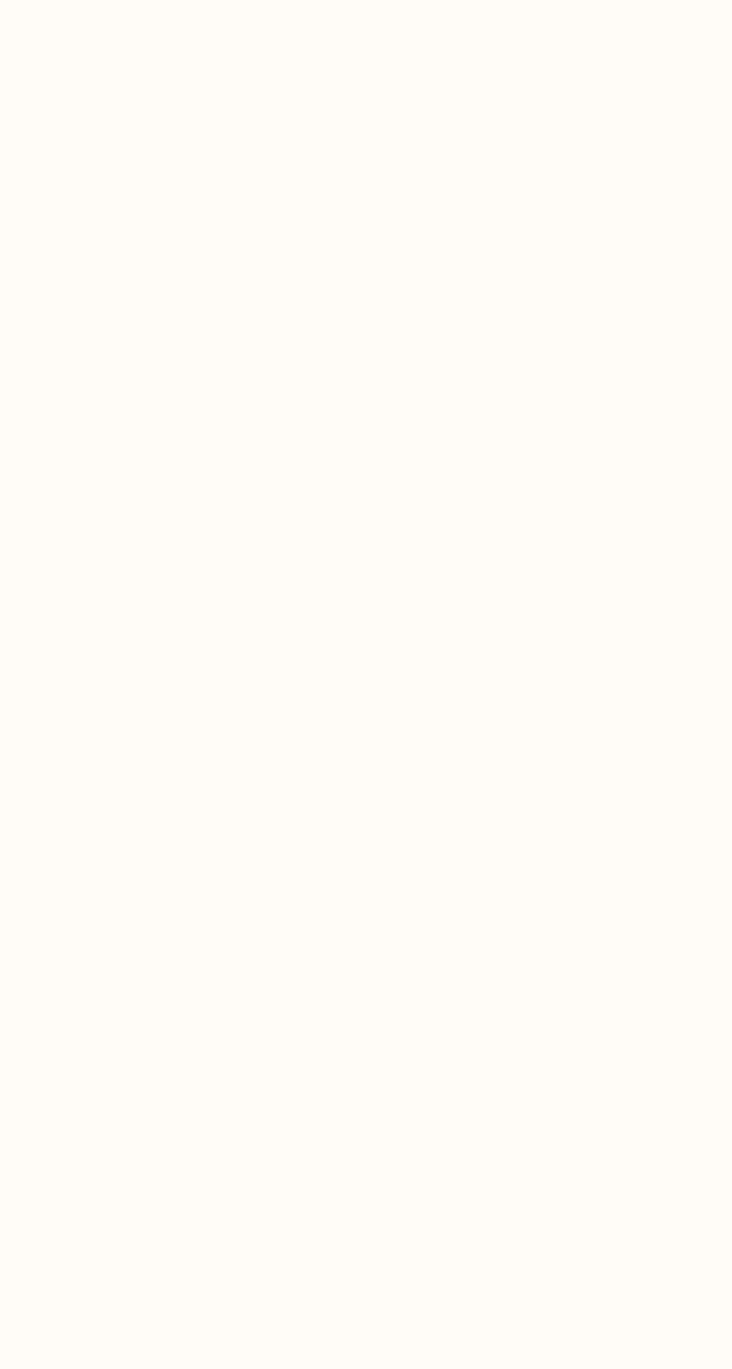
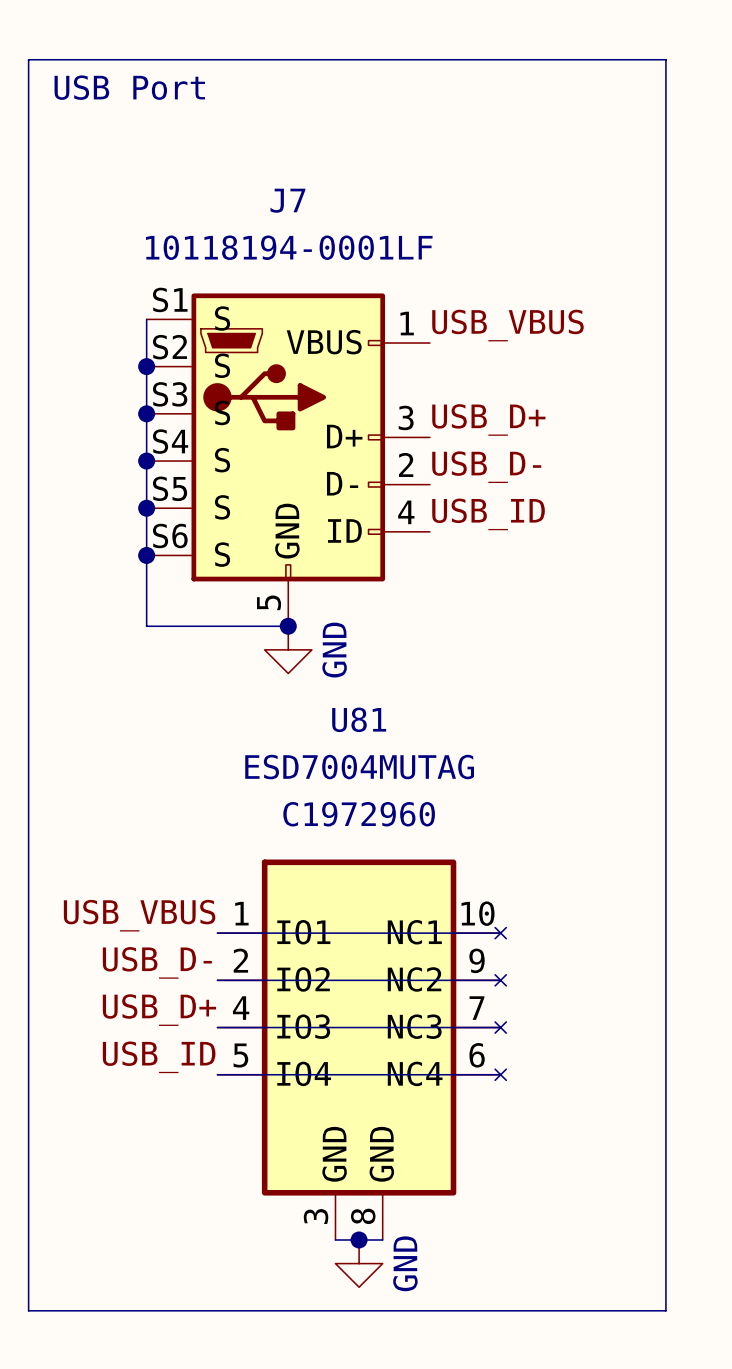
line: none -> (28, 59) (665, 59) (665, 1310) (28, 1310) (28, 59)
text: none -> USB Port (129, 87)
wire: none -> (146, 319) (146, 626) (288, 626)
label: none -> USB_VBUS (507, 325)
junction: none -> (146, 366)
junction: none -> (146, 413)
label: none -> USB_D+ (488, 419)
J7: none -> 10118194-0001LF (288, 459)
junction: none -> (146, 461)
label: none -> USB_D- (486, 467)
junction: none -> (146, 508)
label: none -> USB_ID (488, 514)
junction: none -> (146, 555)
junction: none -> (288, 626)
power symbol: none -> GND (288, 649)
label: none -> USB_VBUS (139, 915)
wire: none -> (217, 933) (500, 933)
label: none -> USB_D- (157, 962)
wire: none -> (217, 980) (500, 980)
label: none -> USB_D+ (159, 1010)
wire: none -> (217, 1027) (500, 1027)
U81: none -> ESD7004MUTAG (361, 1049)
label: none -> USB_ID (159, 1057)
wire: none -> (217, 1074) (500, 1074)
wire: none -> (335, 1239) (382, 1239)
junction: none -> (359, 1239)
power symbol: none -> GND (359, 1263)

